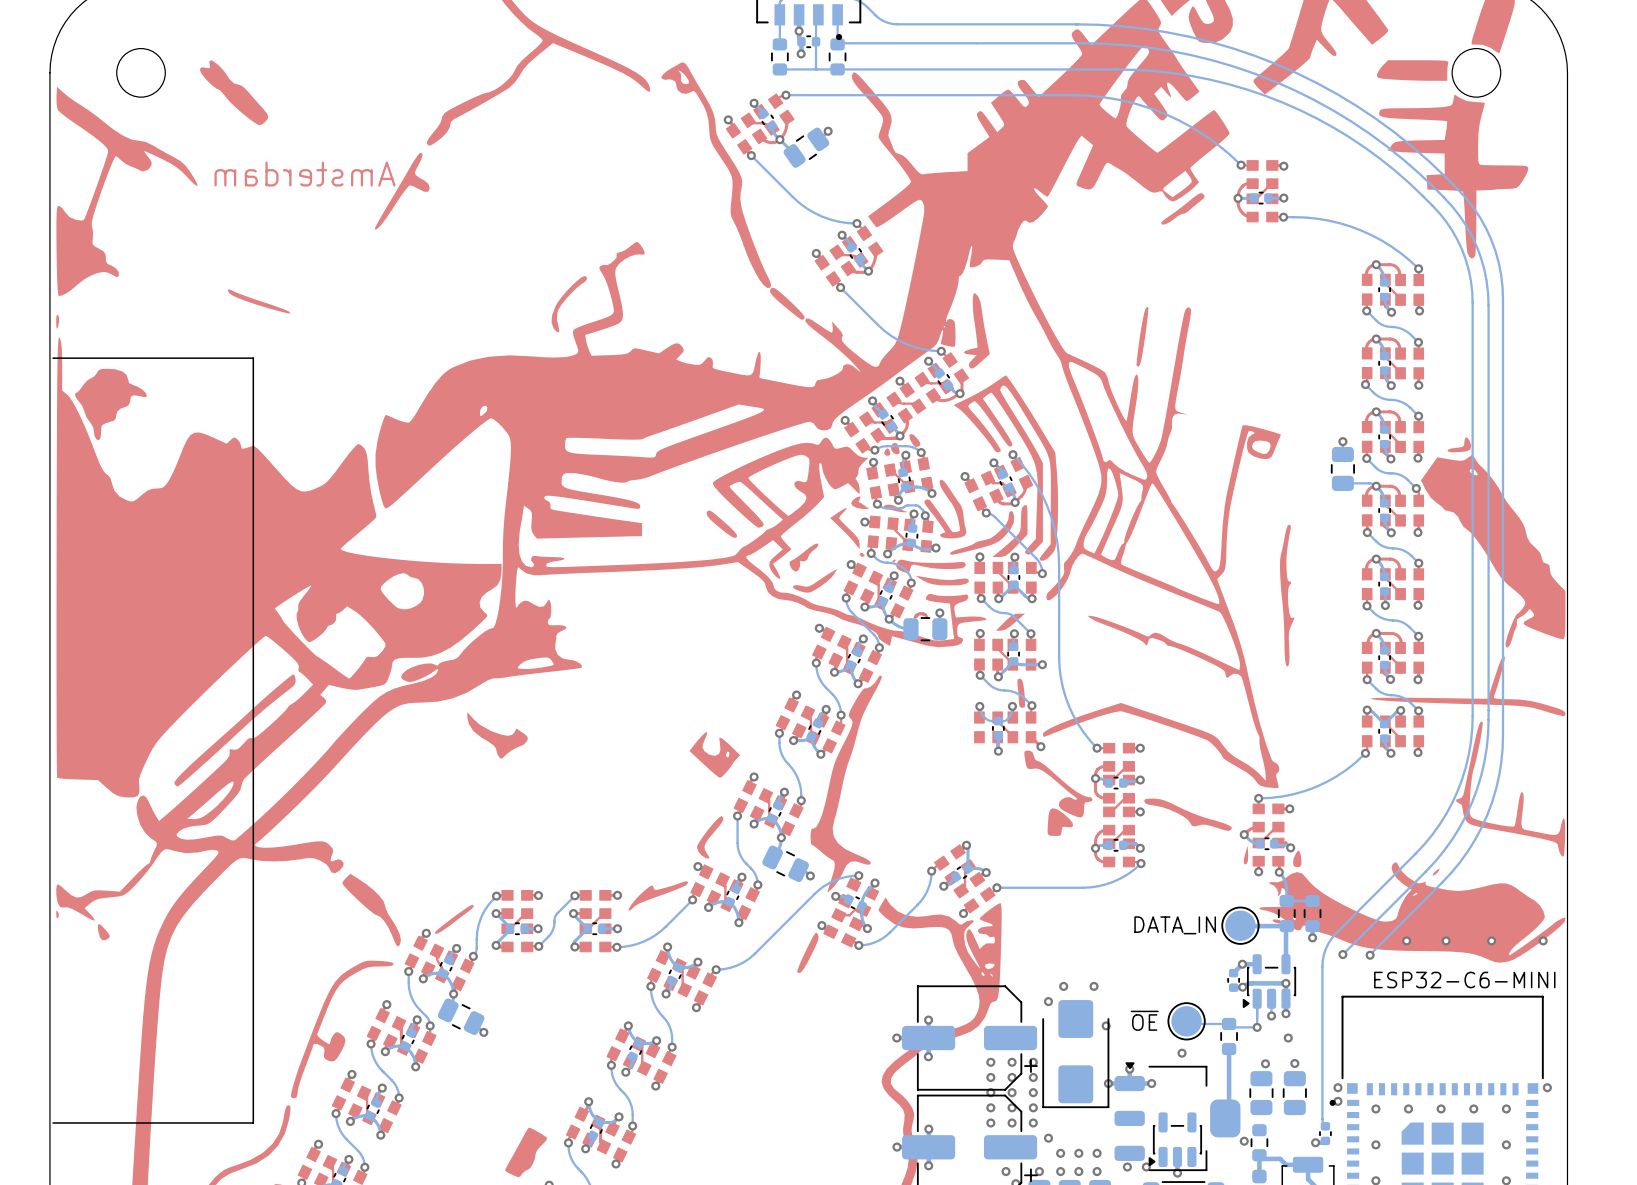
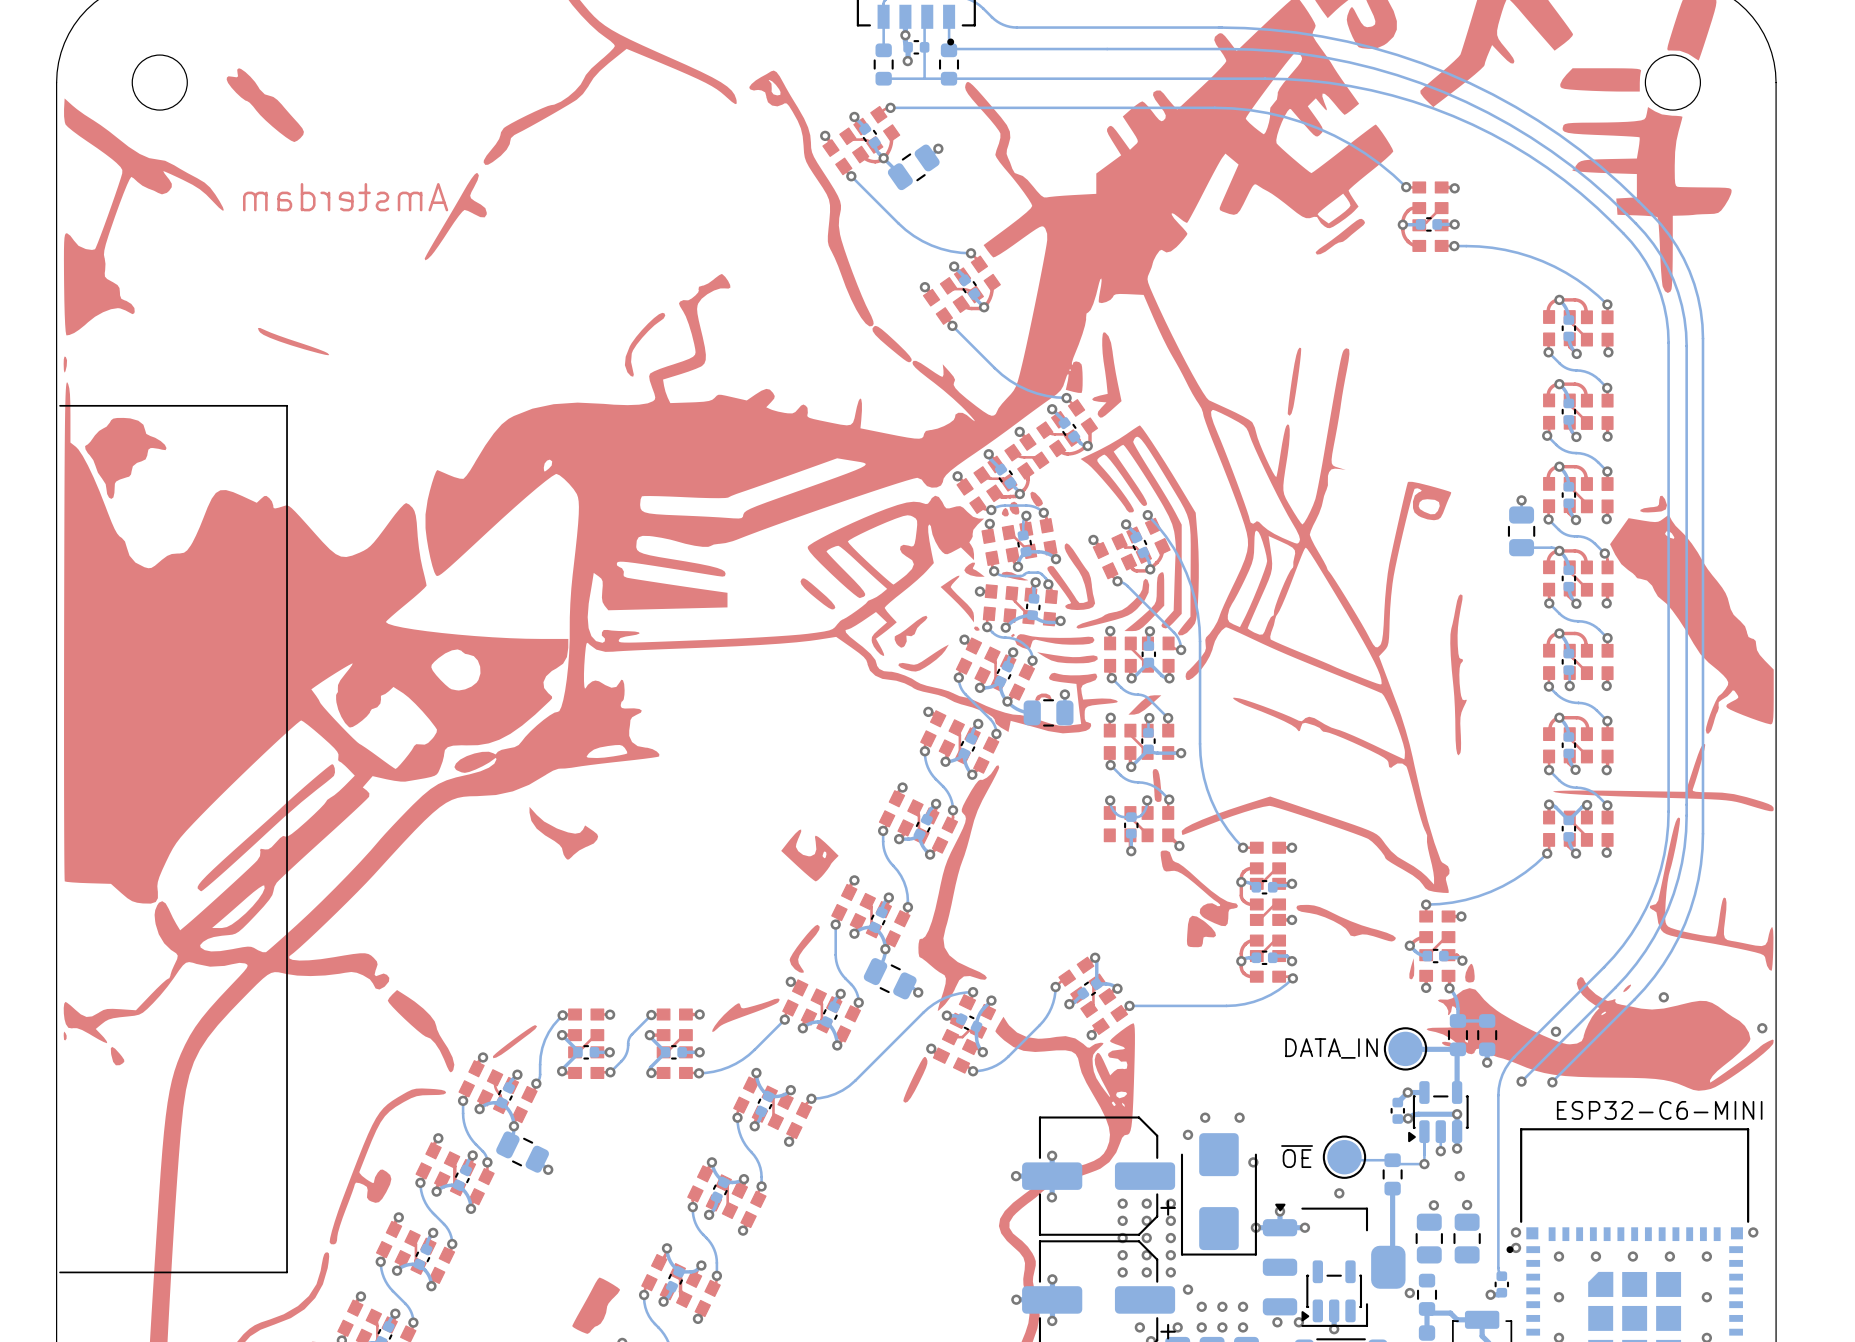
via: none -> (1663, 997)
via: none -> (1555, 1031)
via: (1406, 940) -> none
via: (1446, 940) -> none
via: (1491, 940) -> none
via position: (1543, 940) -> (1762, 1028)

